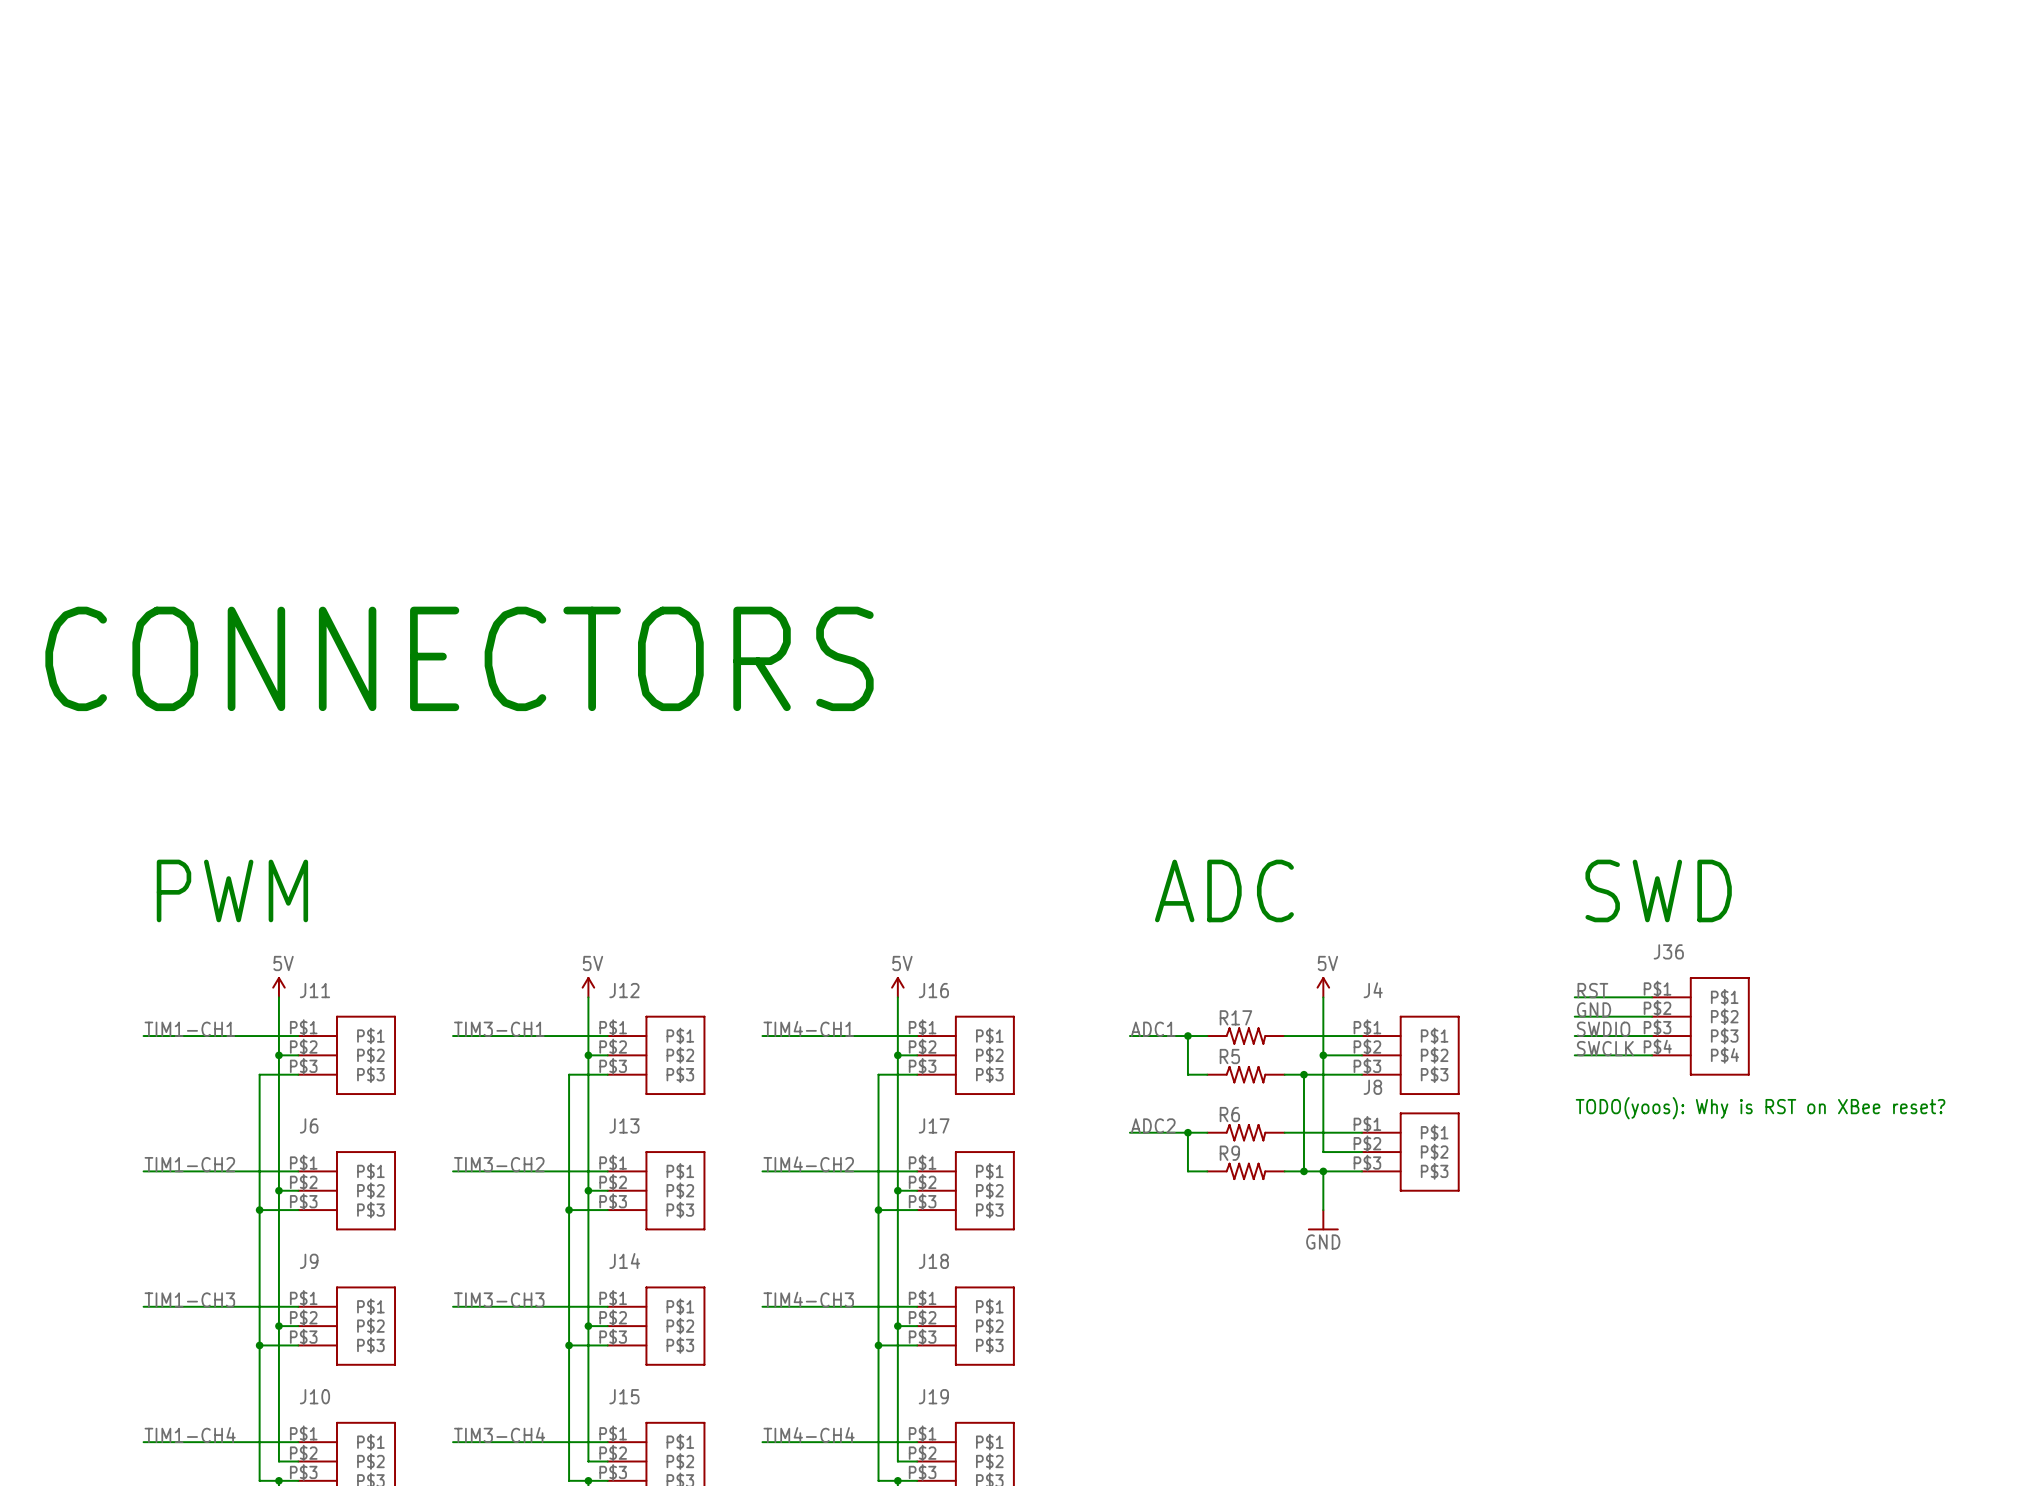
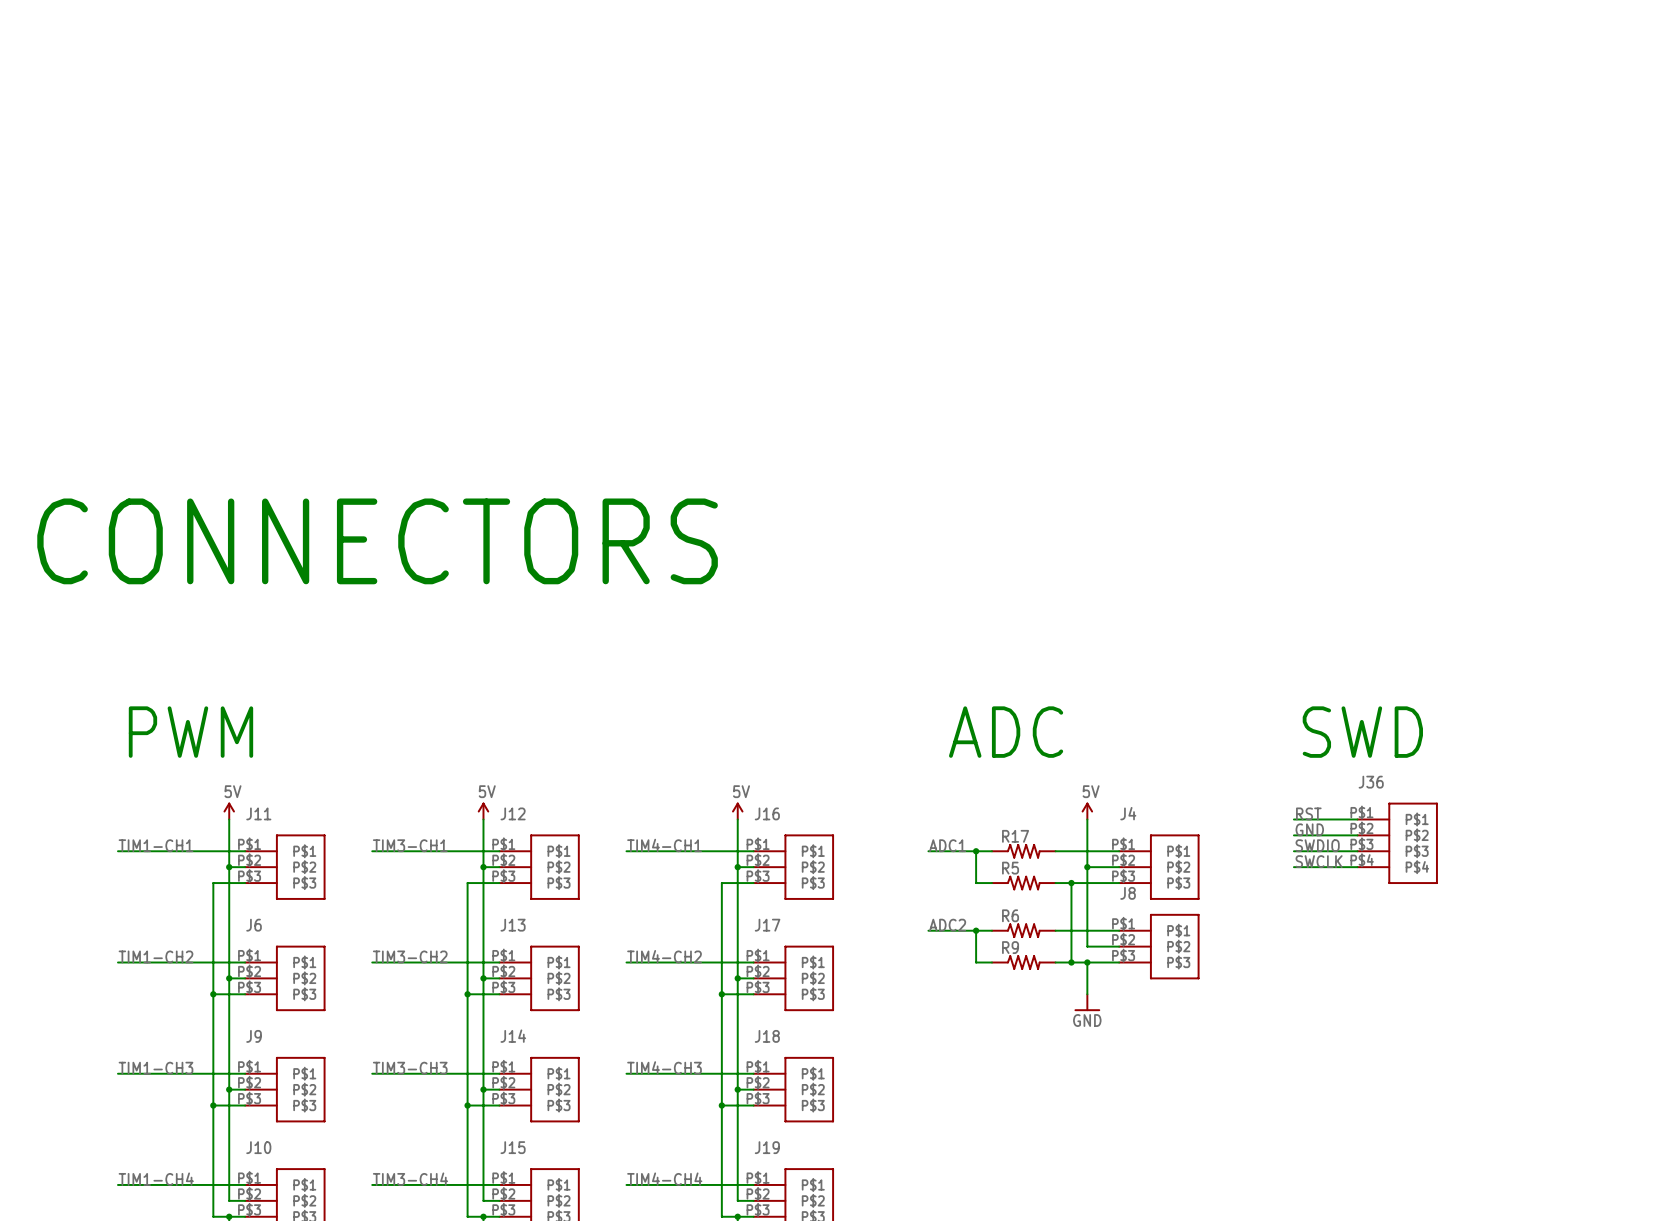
text: TODO(yoos): Why is RST on XBee reset? (1760, 1108) -> none

